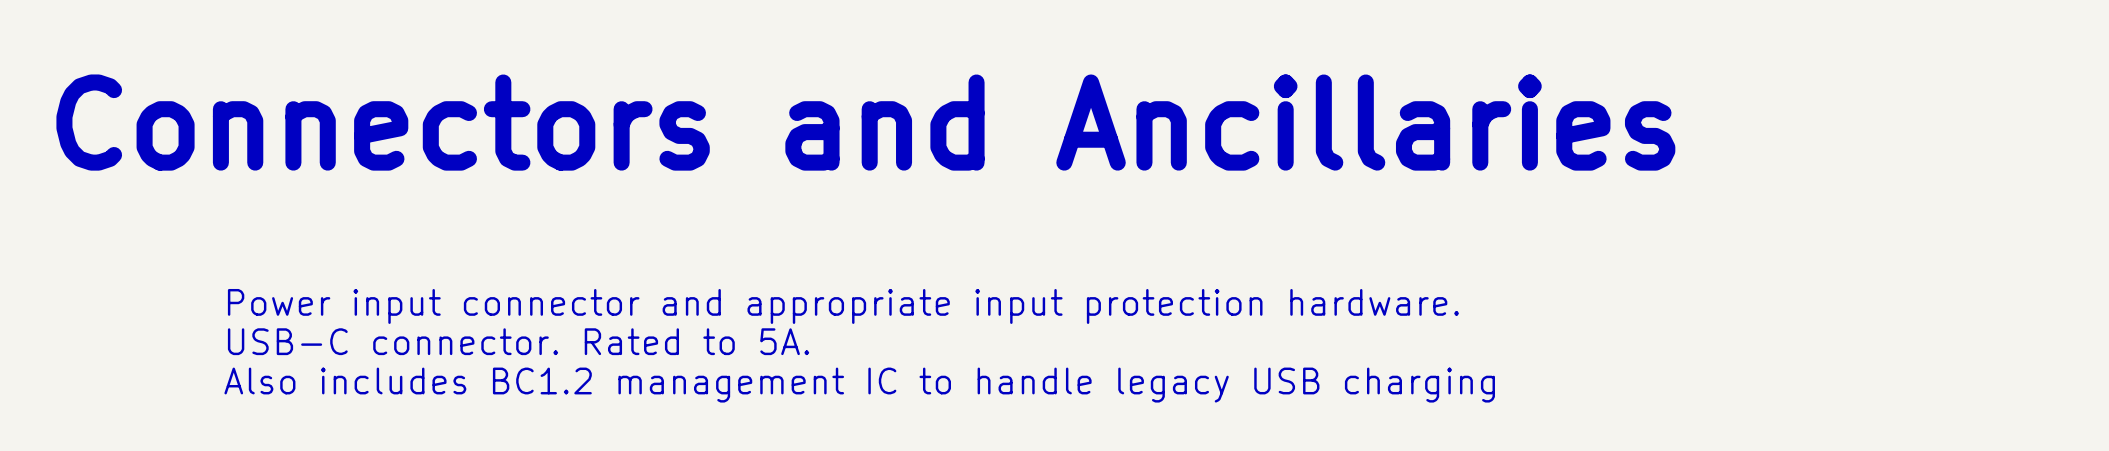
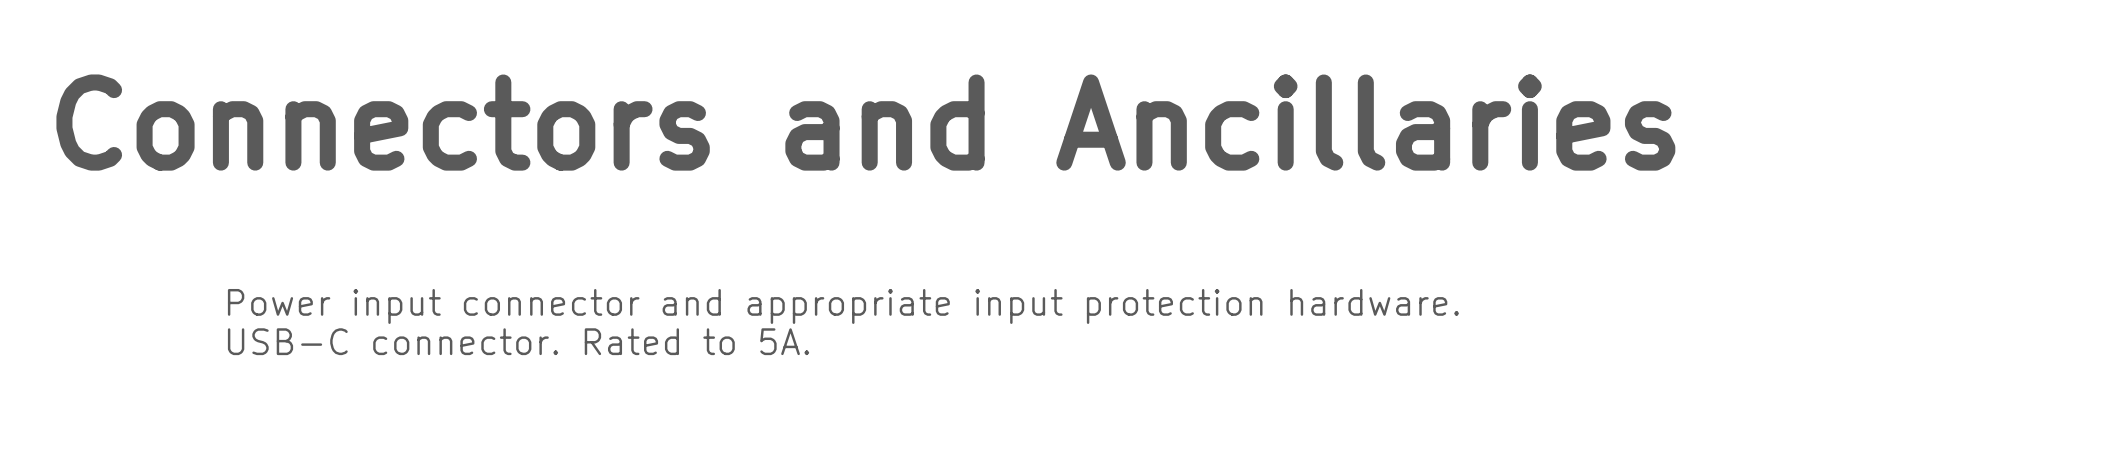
text: Also includes BC1.2 management IC to handle legacy USB charging (859, 385) -> none

